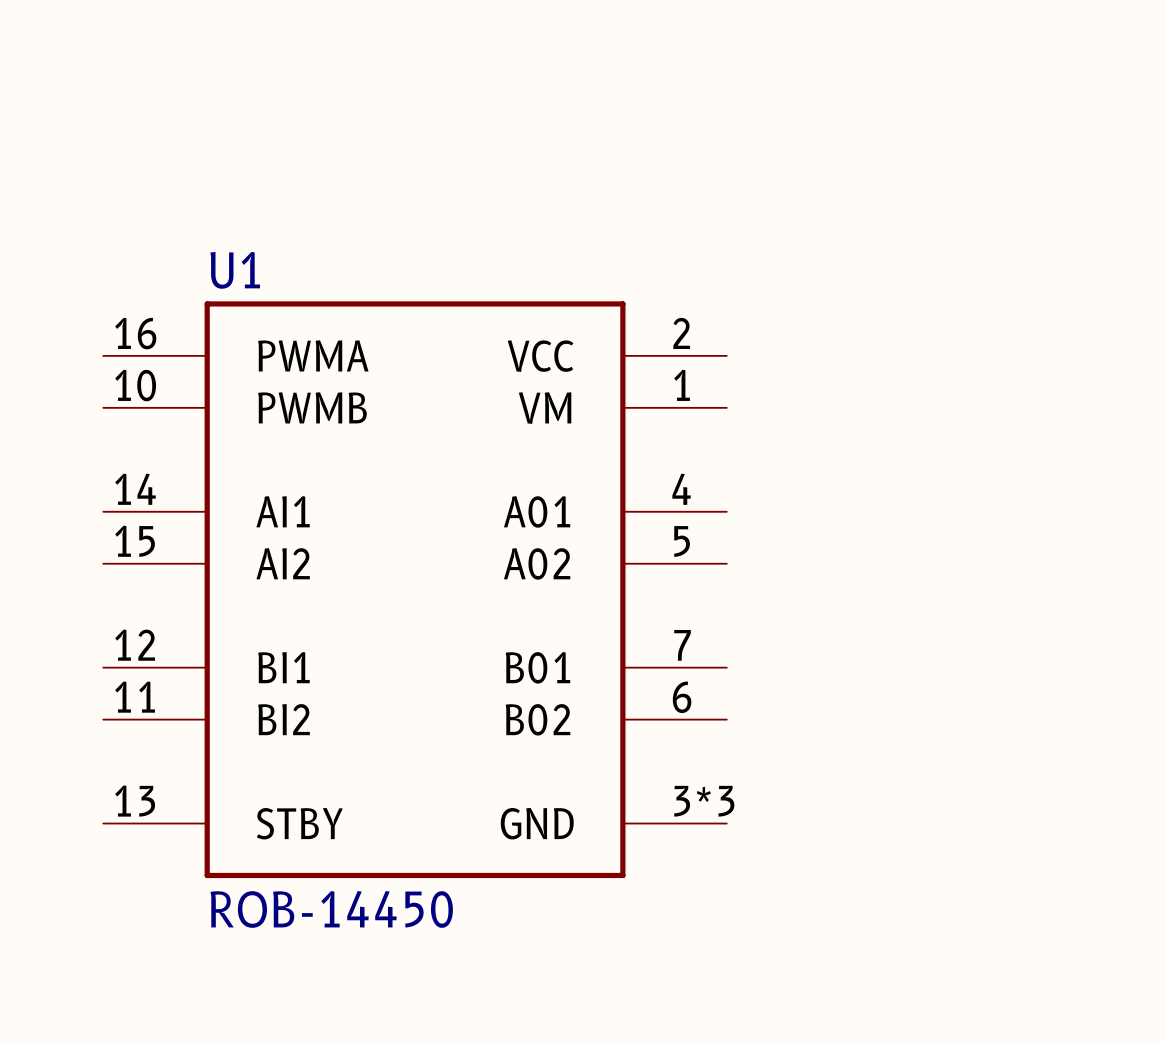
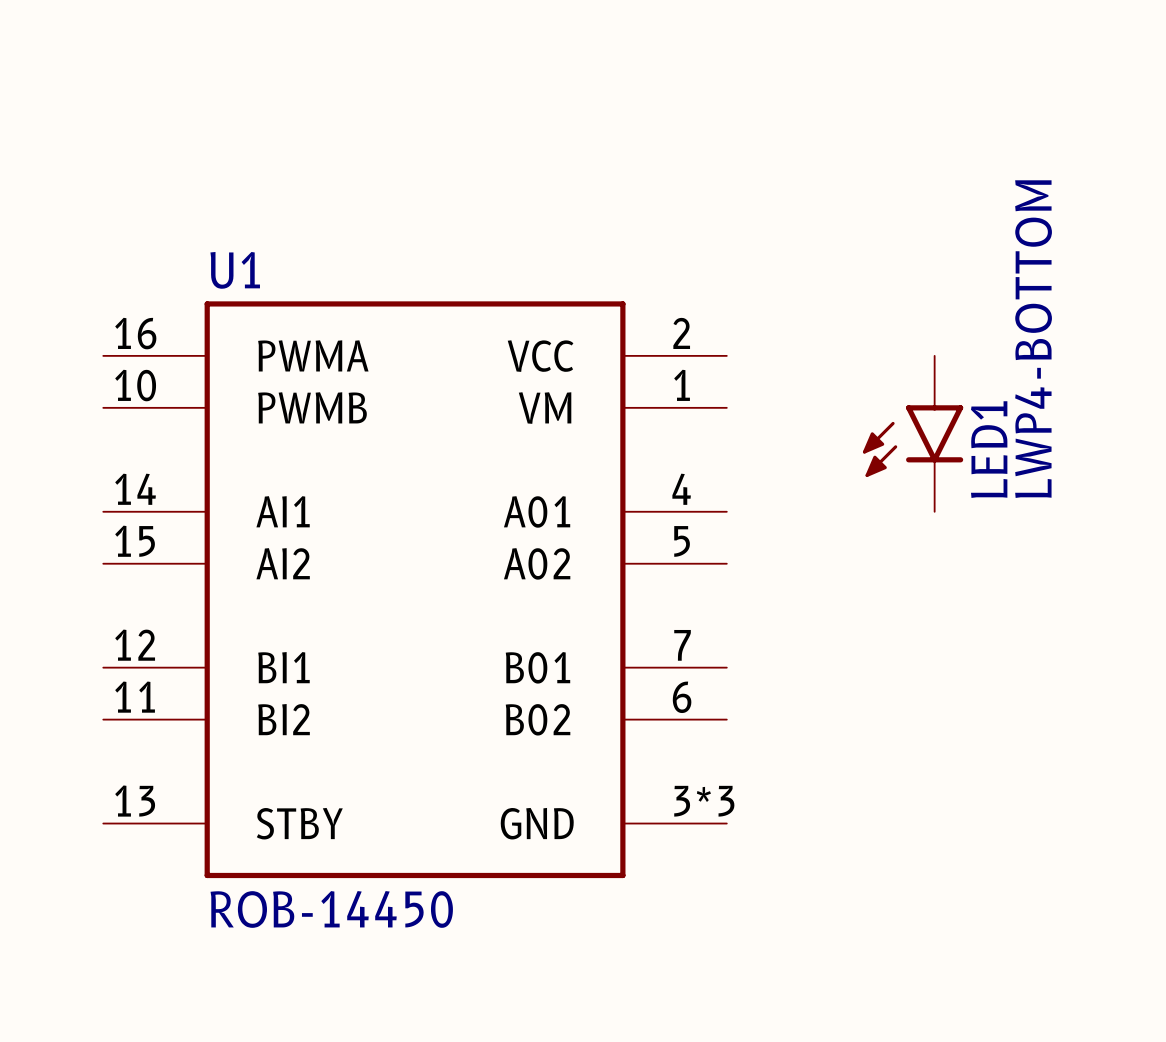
LED1: none -> LWP4-BOTTOM (913, 433)

